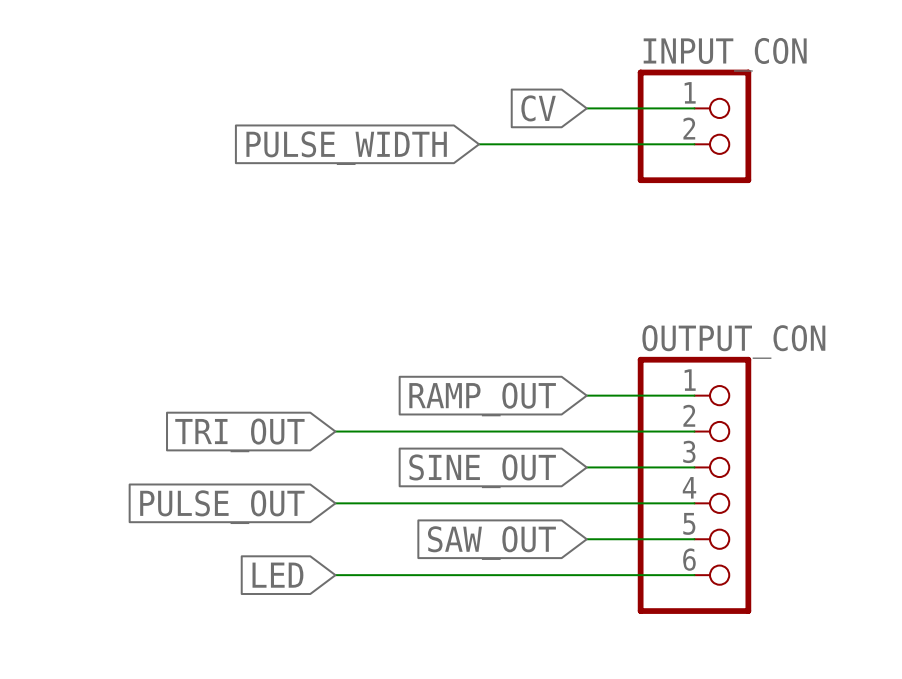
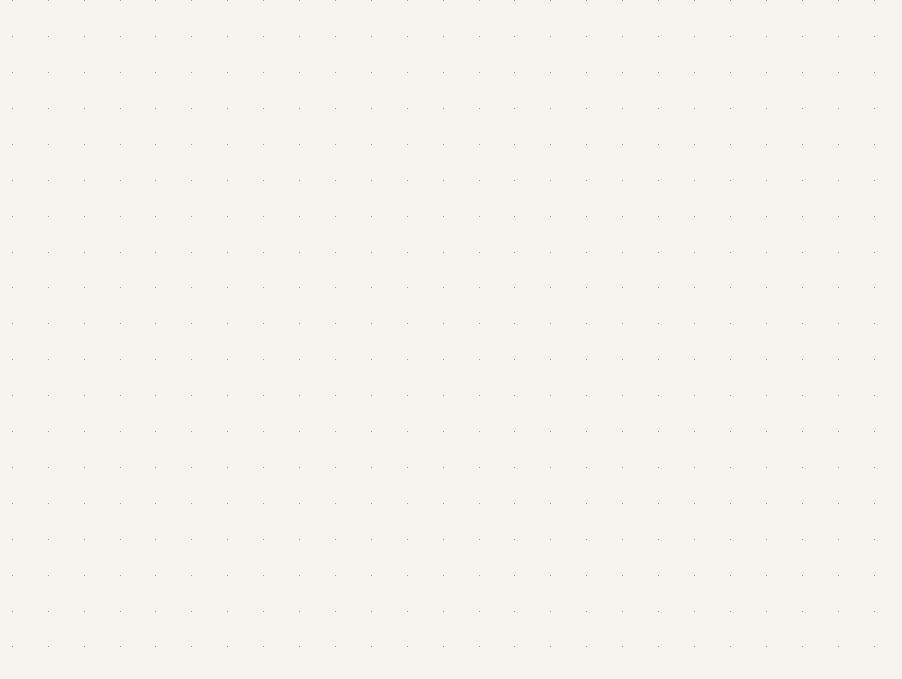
global label: CV (538, 108) -> none
wire: (586, 108) (694, 108) -> none
INPUT_CON: (694, 126) -> none
wire: (479, 144) (694, 144) -> none
global label: PULSE_WIDTH (346, 148) -> none
wire: (586, 395) (694, 395) -> none
global label: RAMP_OUT (482, 399) -> none
wire: (335, 431) (694, 431) -> none
global label: TRI_OUT (239, 435) -> none
wire: (586, 467) (694, 467) -> none
global label: SINE_OUT (482, 471) -> none
OUTPUT_CON: (694, 485) -> none
wire: (335, 503) (694, 503) -> none
global label: PULSE_OUT (222, 507) -> none
wire: (586, 539) (694, 539) -> none
global label: SAW_OUT (491, 543) -> none
global label: LED (277, 575) -> none
wire: (335, 575) (694, 575) -> none

